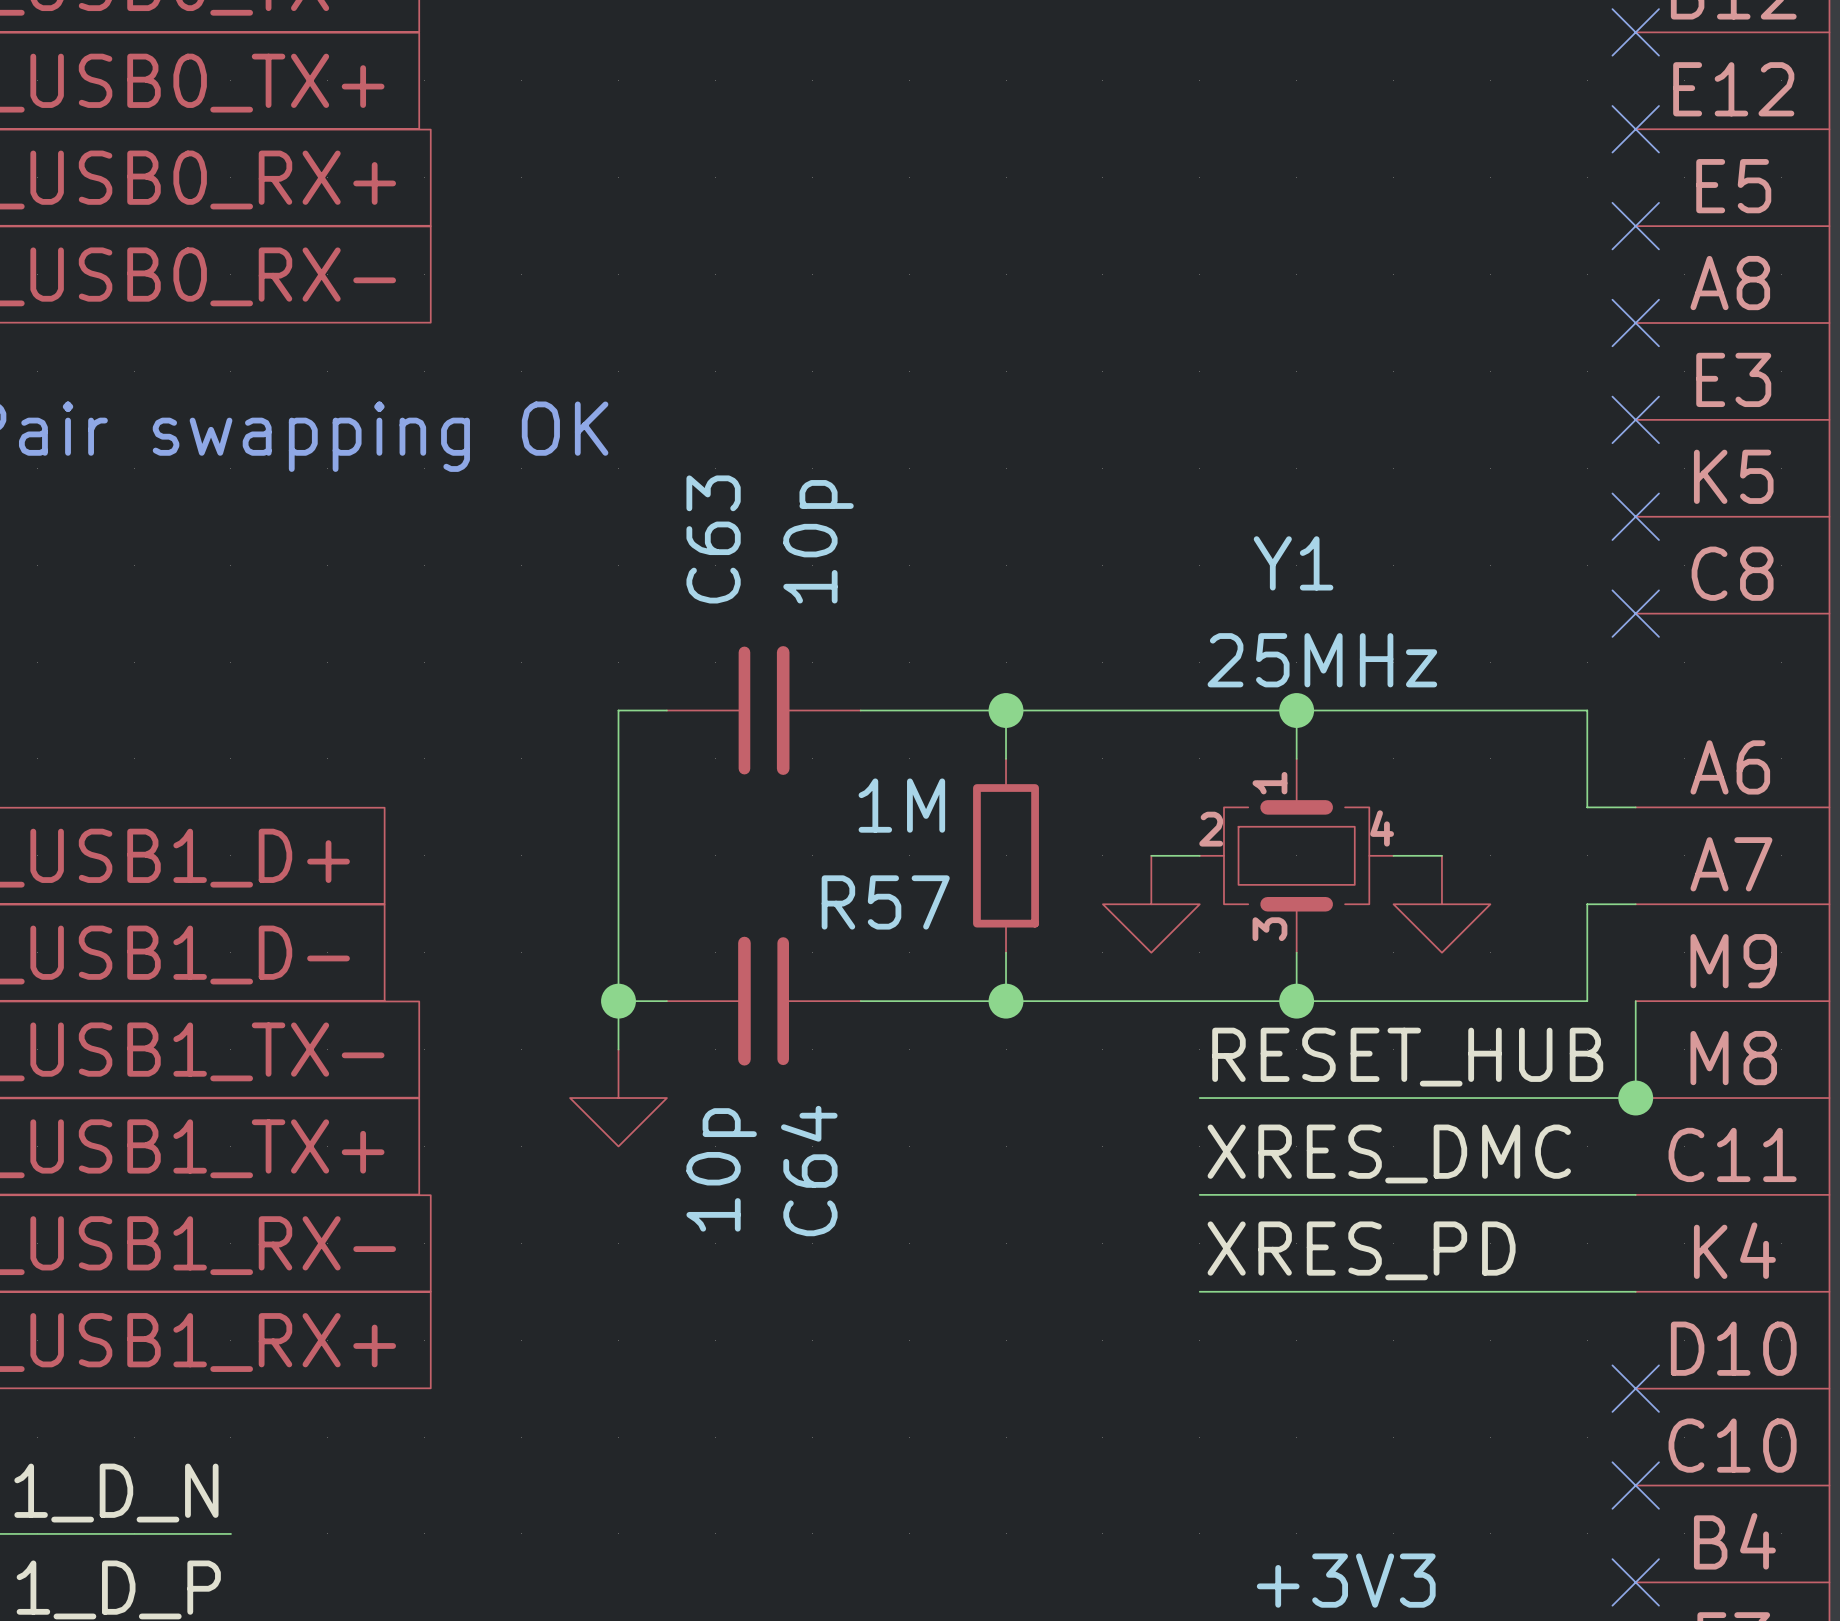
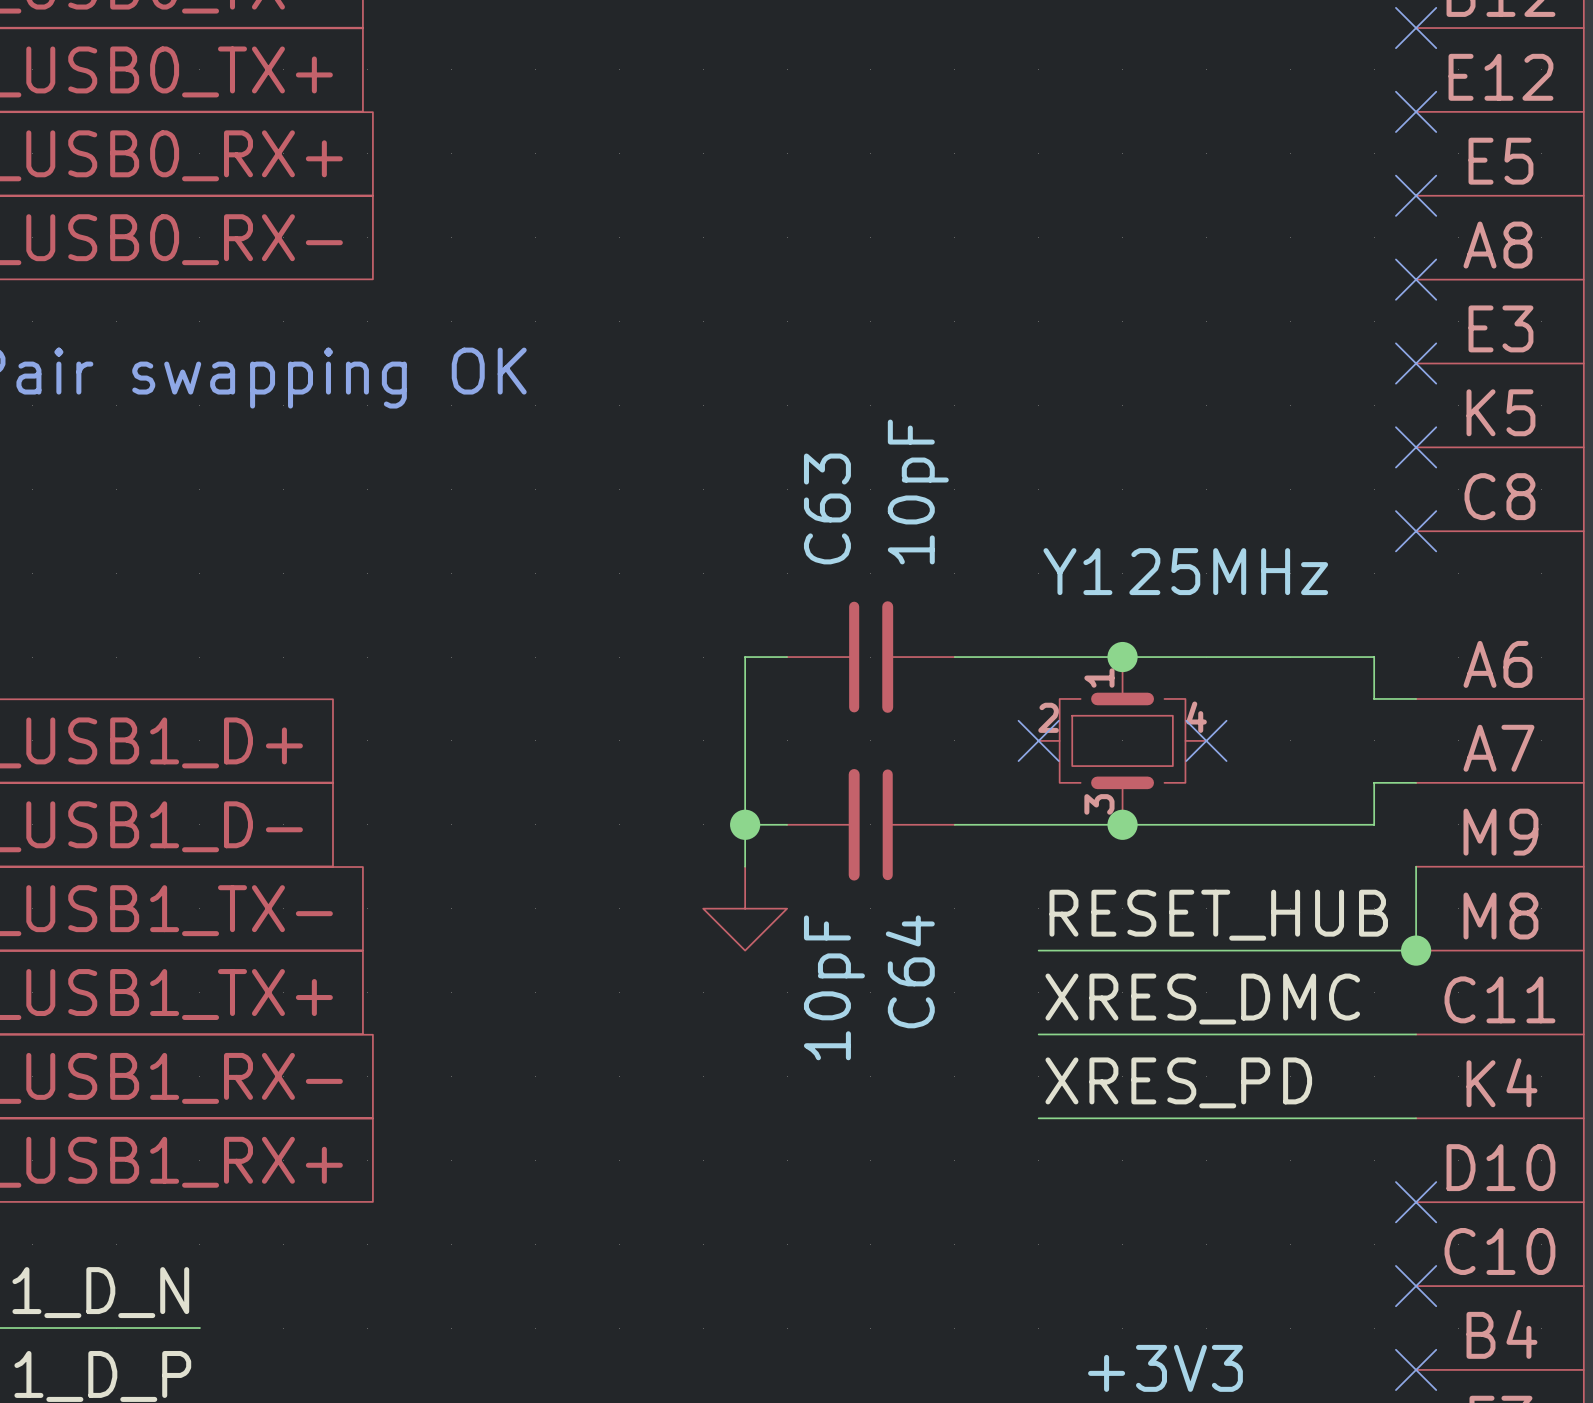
C63 value: 10p (818, 541) -> 10pF (918, 491)
Y1 name position: Y1 (1293, 563) -> Y1 (1077, 571)
Y1 value position: 25MHz (1322, 660) -> 25MHz (1228, 571)
wire: (666, 710) (618, 710) (618, 1049) -> none
C63 position: (763, 710) -> (870, 657)
wire: (860, 710) (1587, 710) (1587, 758) -> (954, 657) (1374, 657)
wire: (1006, 710) (1006, 758) -> none
junction: (1006, 710) -> none
wire: (1296, 710) (1296, 758) -> none
junction position: (1296, 710) -> (1122, 657)
wire: none -> (787, 657) (745, 657) (745, 866)
R57: 1M (1006, 855) -> none
wire: (1151, 855) (1199, 855) -> none
no-connect mark: none -> (1038, 740)
wire: (1393, 855) (1441, 855) -> none
no-connect mark: none -> (1206, 740)
power symbol: (1151, 904) -> none
power symbol: (1441, 904) -> none
junction: none -> (745, 824)
wire: (1006, 952) (1006, 1001) -> none
wire: (1296, 952) (1296, 1001) -> none
wire: (1587, 952) (1587, 1001) (860, 1001) -> (1374, 824) (954, 824)
wire: (618, 1001) (666, 1001) -> (745, 824) (787, 824)
junction: (618, 1001) -> none
C64 position: (763, 1001) -> (870, 824)
junction: (1006, 1001) -> none
junction position: (1296, 1001) -> (1122, 824)
power symbol: none -> (745, 908)
power symbol: (618, 1098) -> none
C64 value: 10p (721, 1169) -> 10pF (834, 987)

